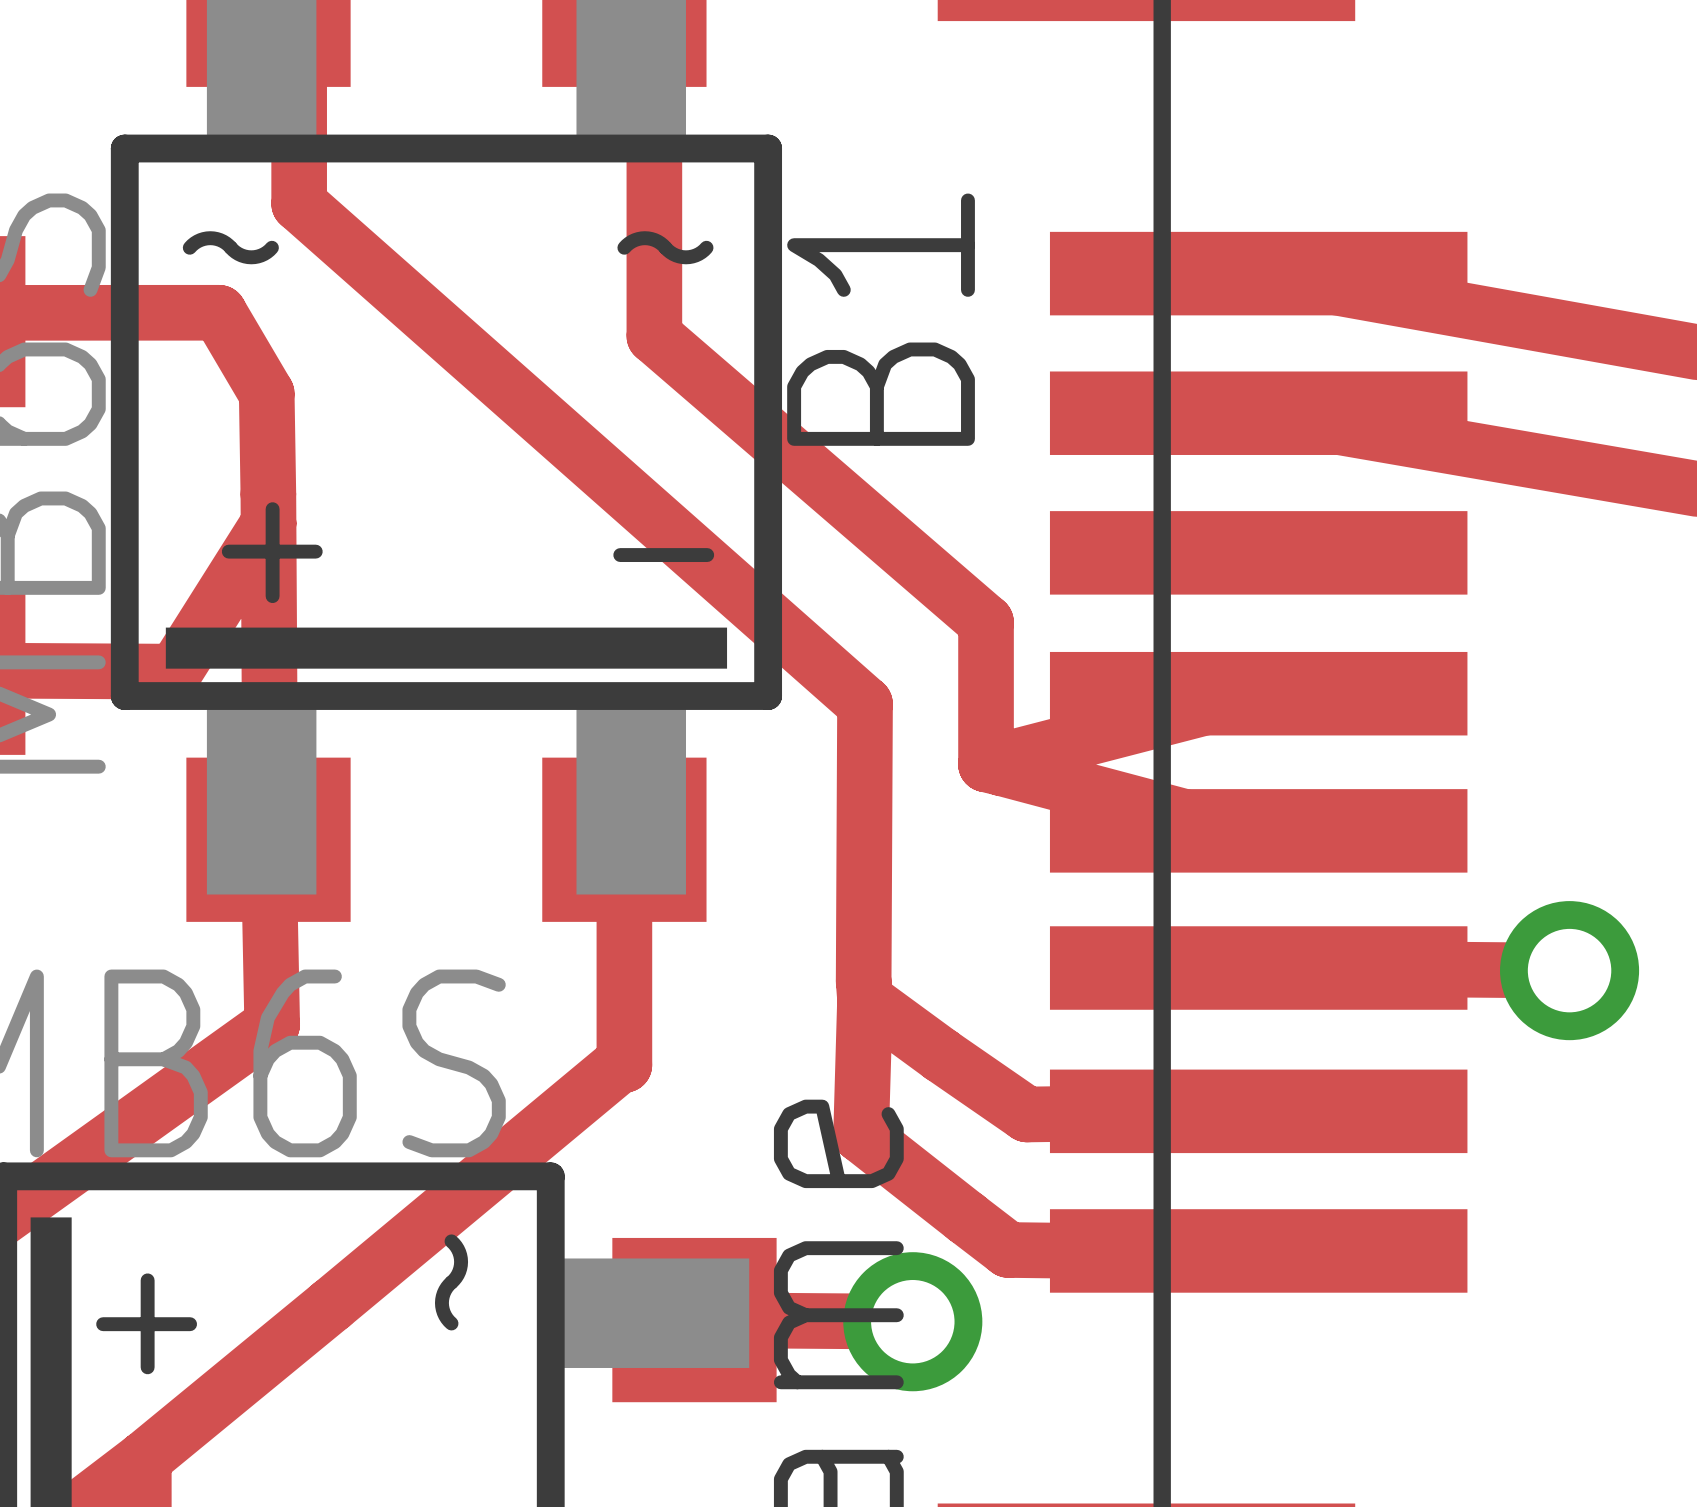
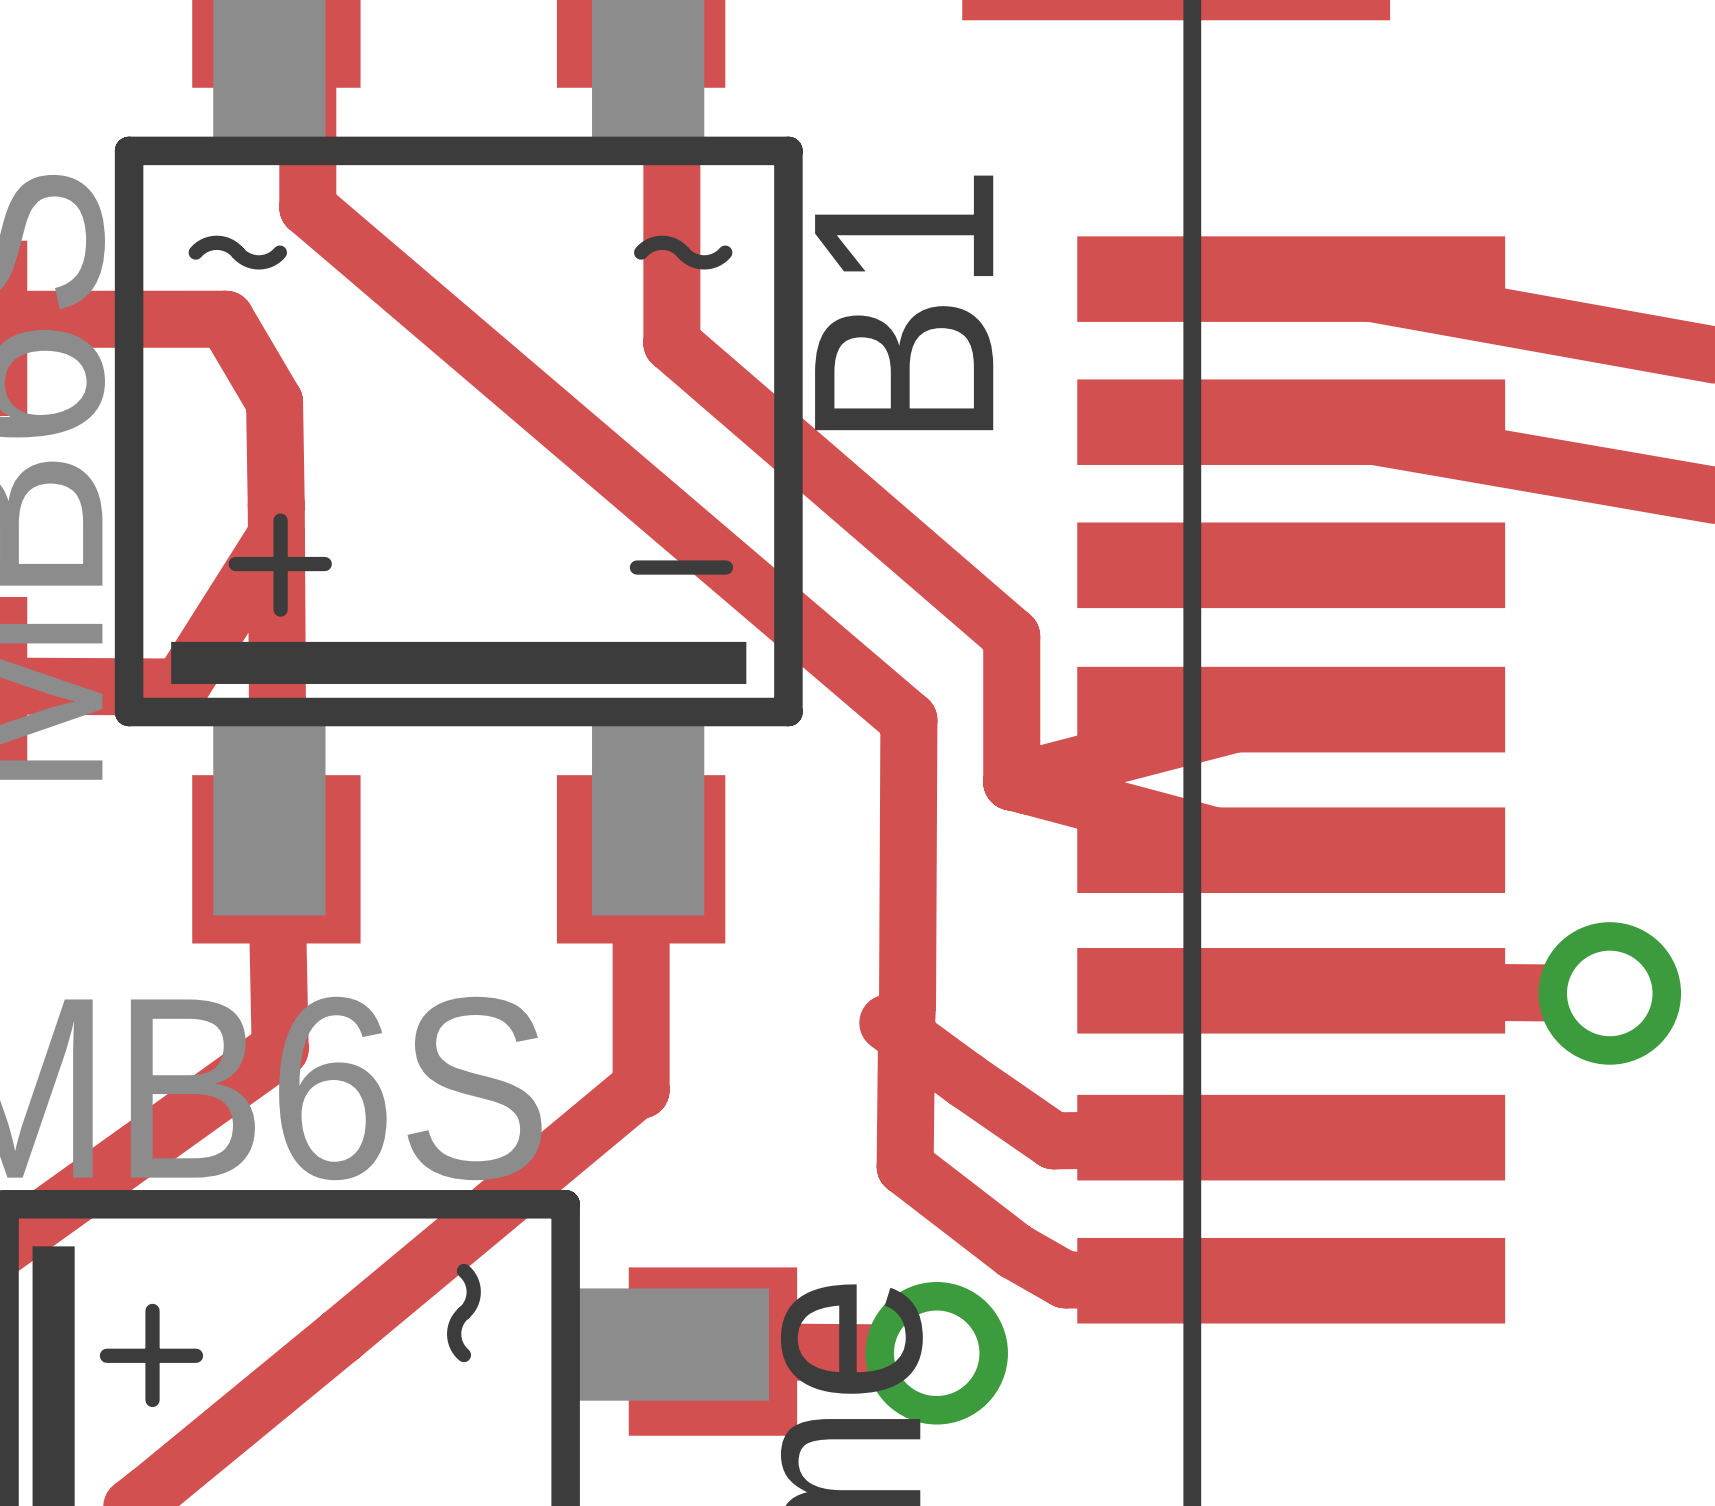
track: (299, 203) (865, 703) (865, 999) (861, 1134) (1008, 1249) (1258, 1253) -> (307, 207) (908, 720) (905, 1166) (1015, 1251) (1065, 1279) (1291, 1282)

